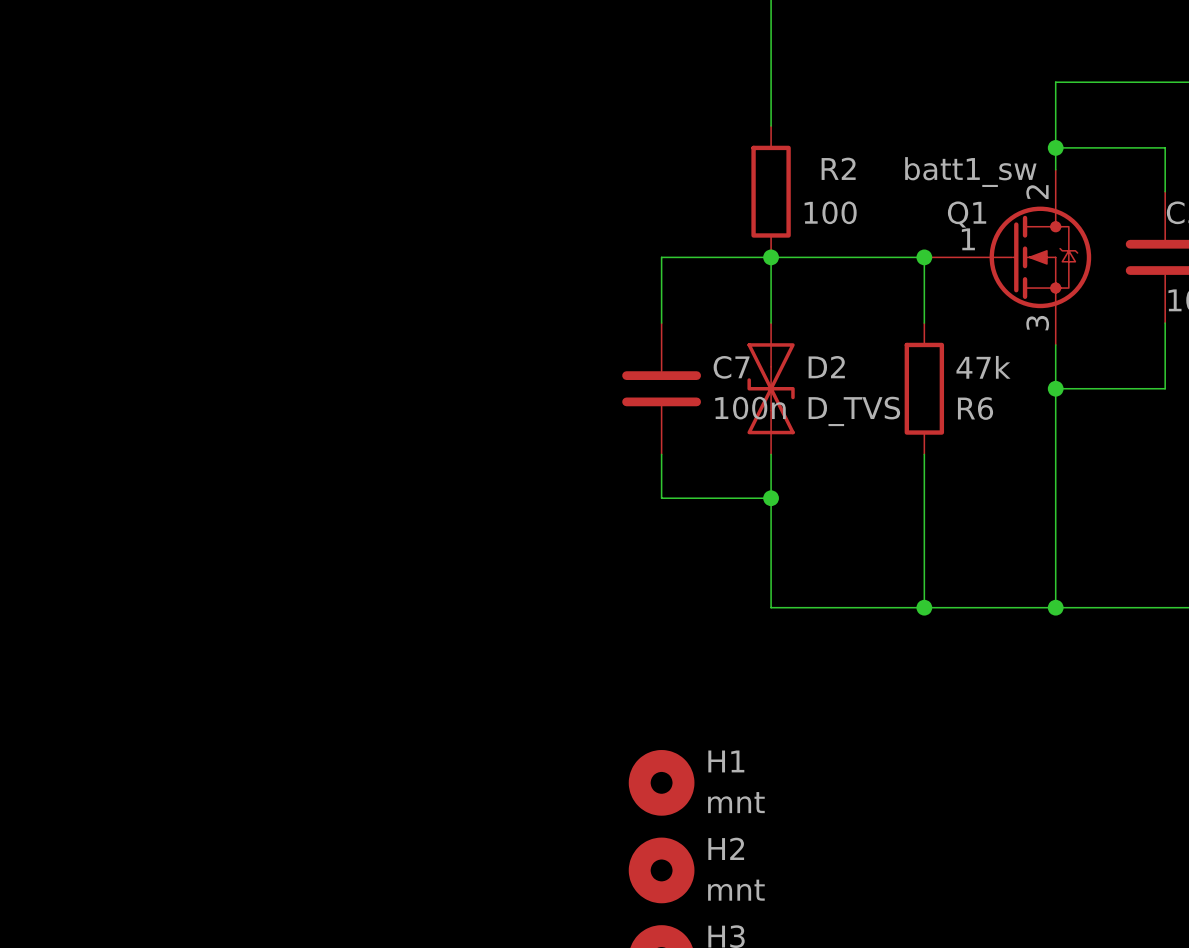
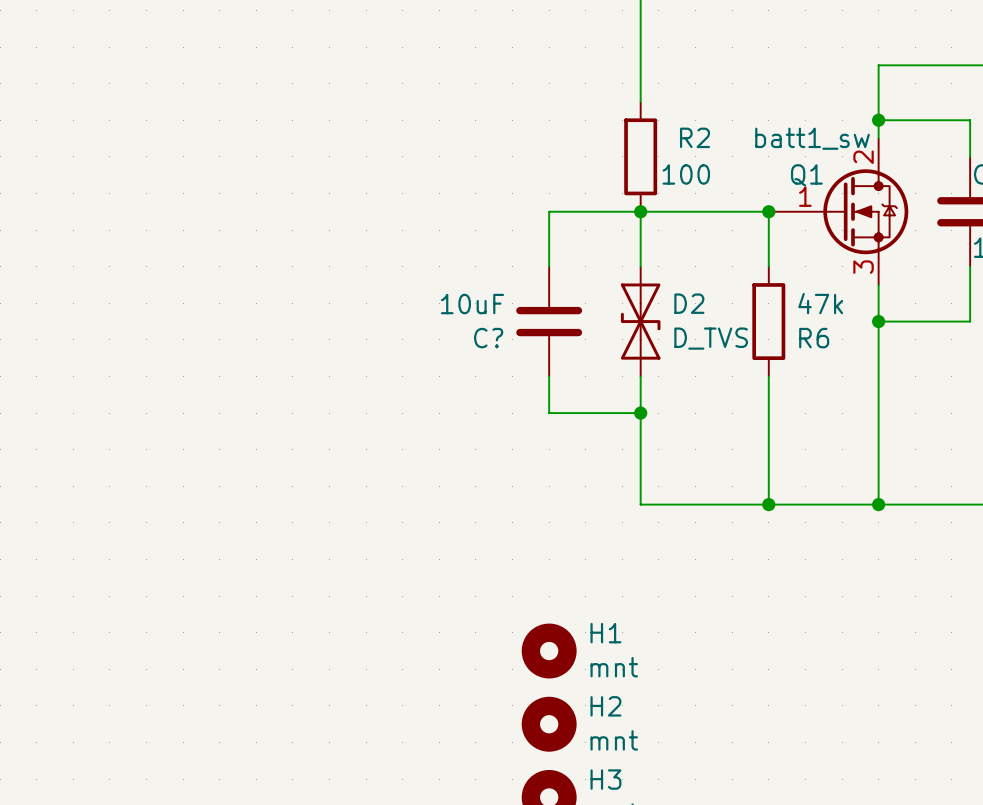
C7 name: C7 (731, 367) -> C? (488, 338)
C7 value: 100n (750, 408) -> 10uF (472, 304)

